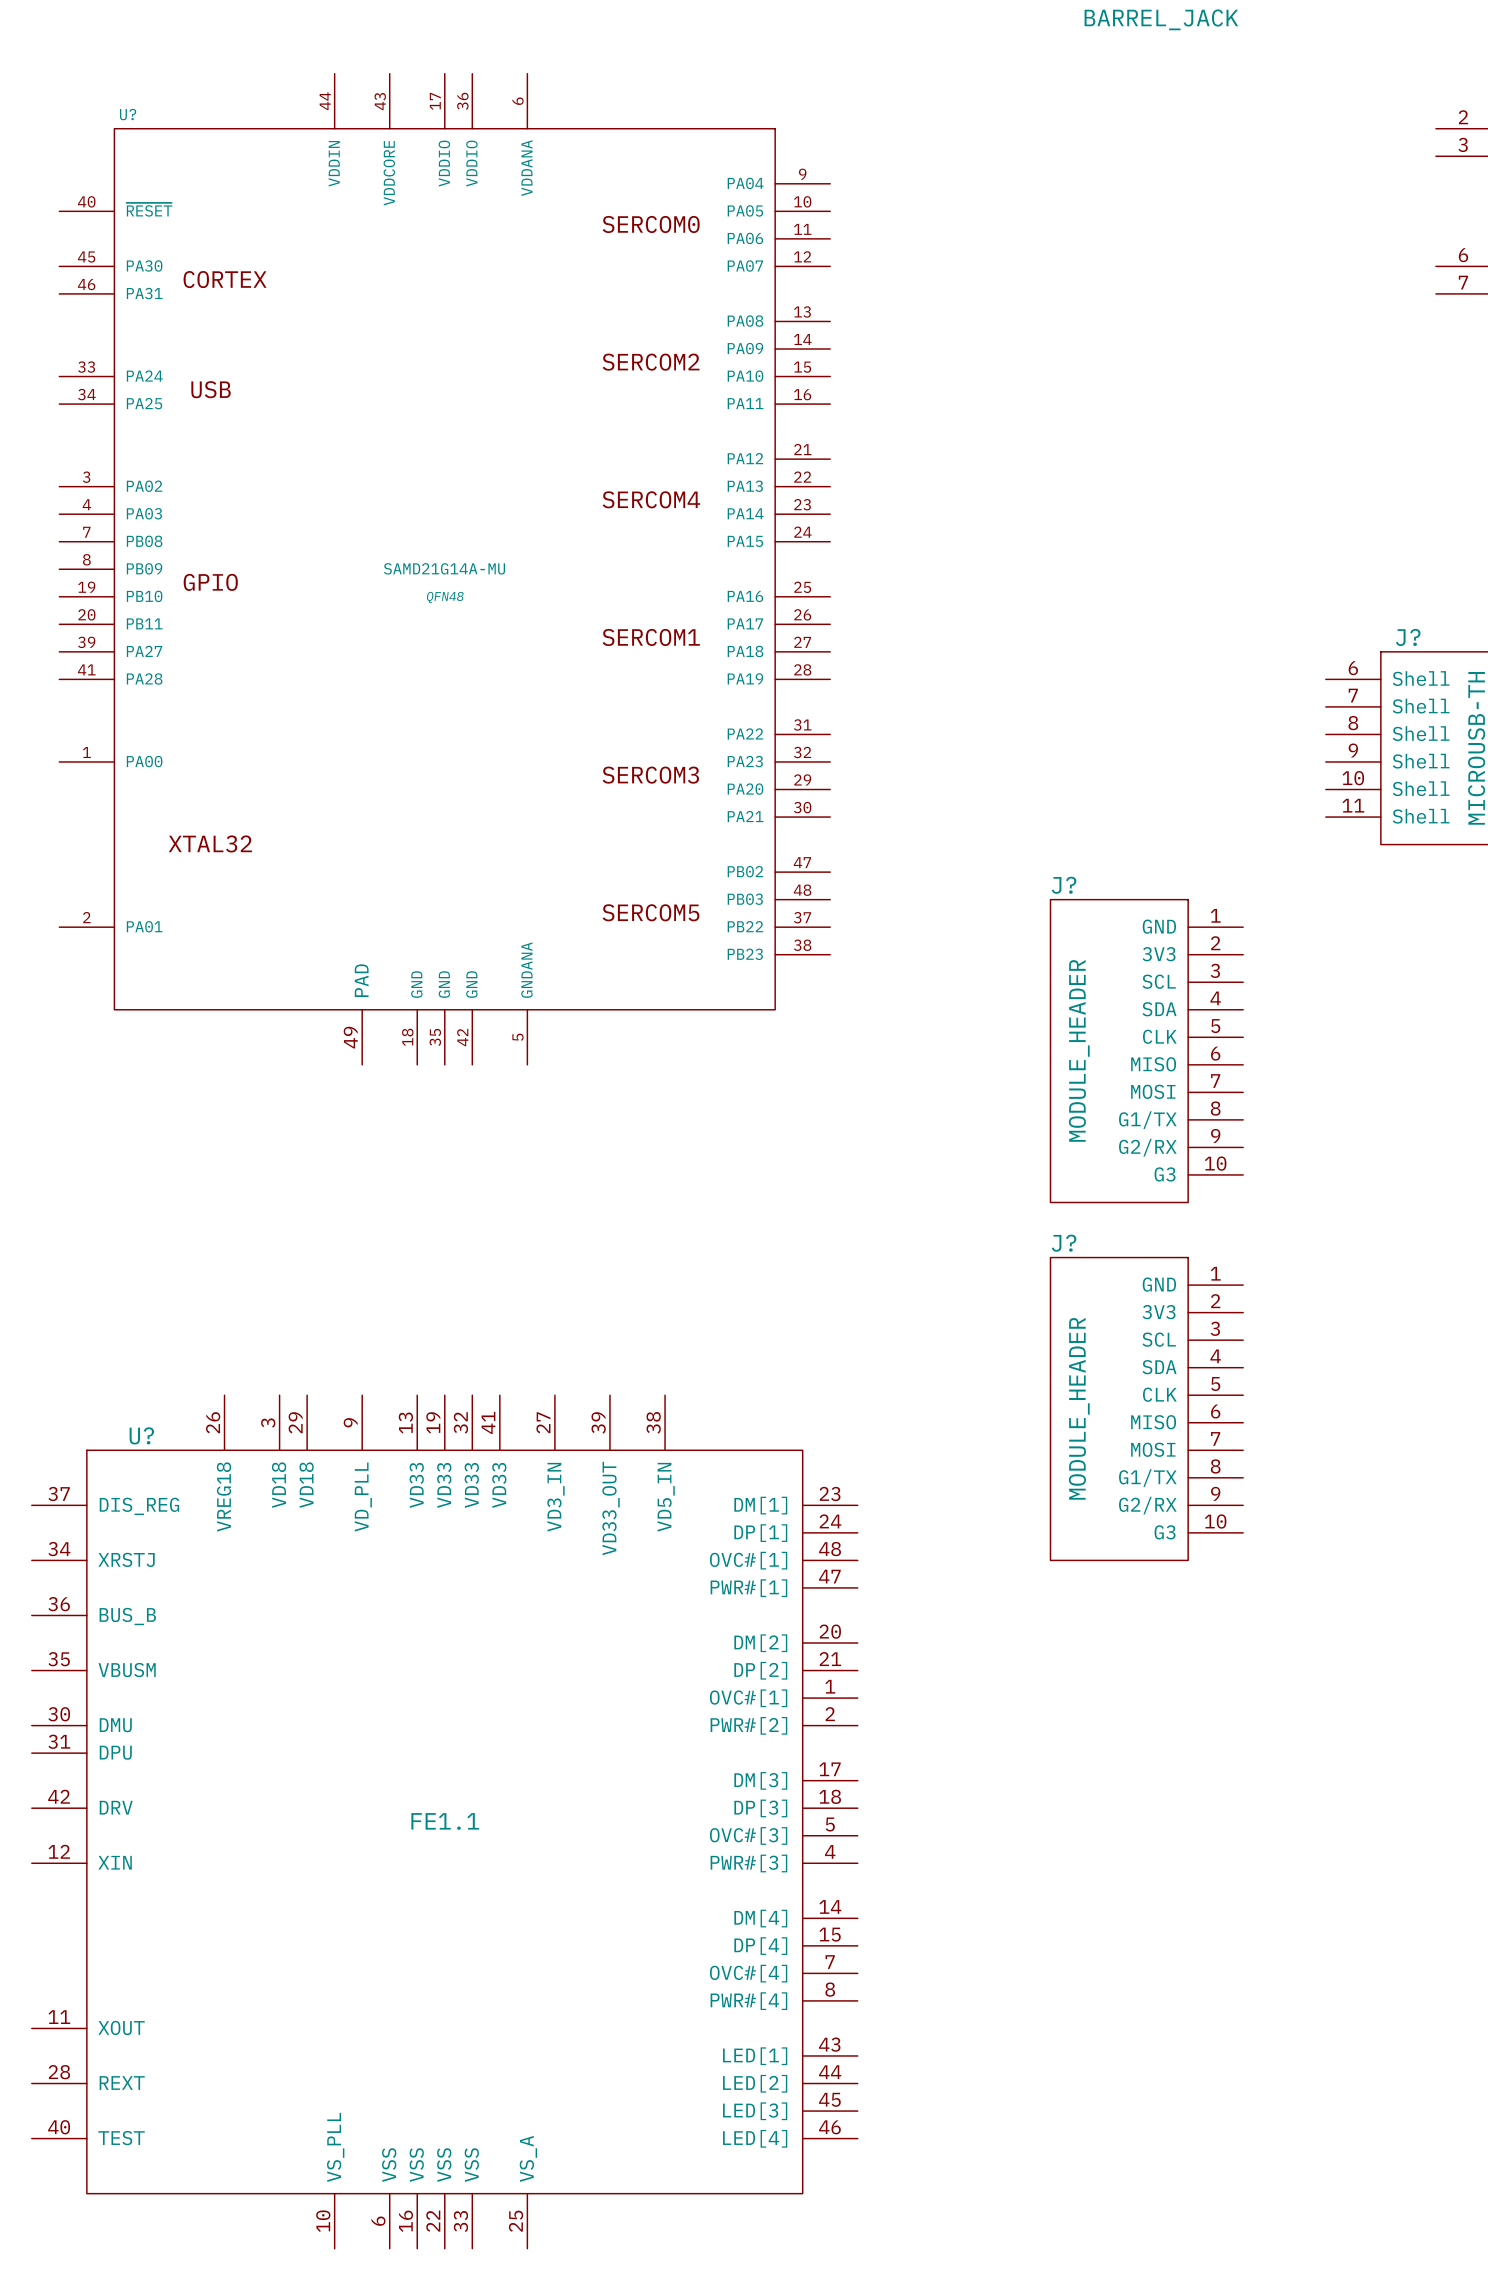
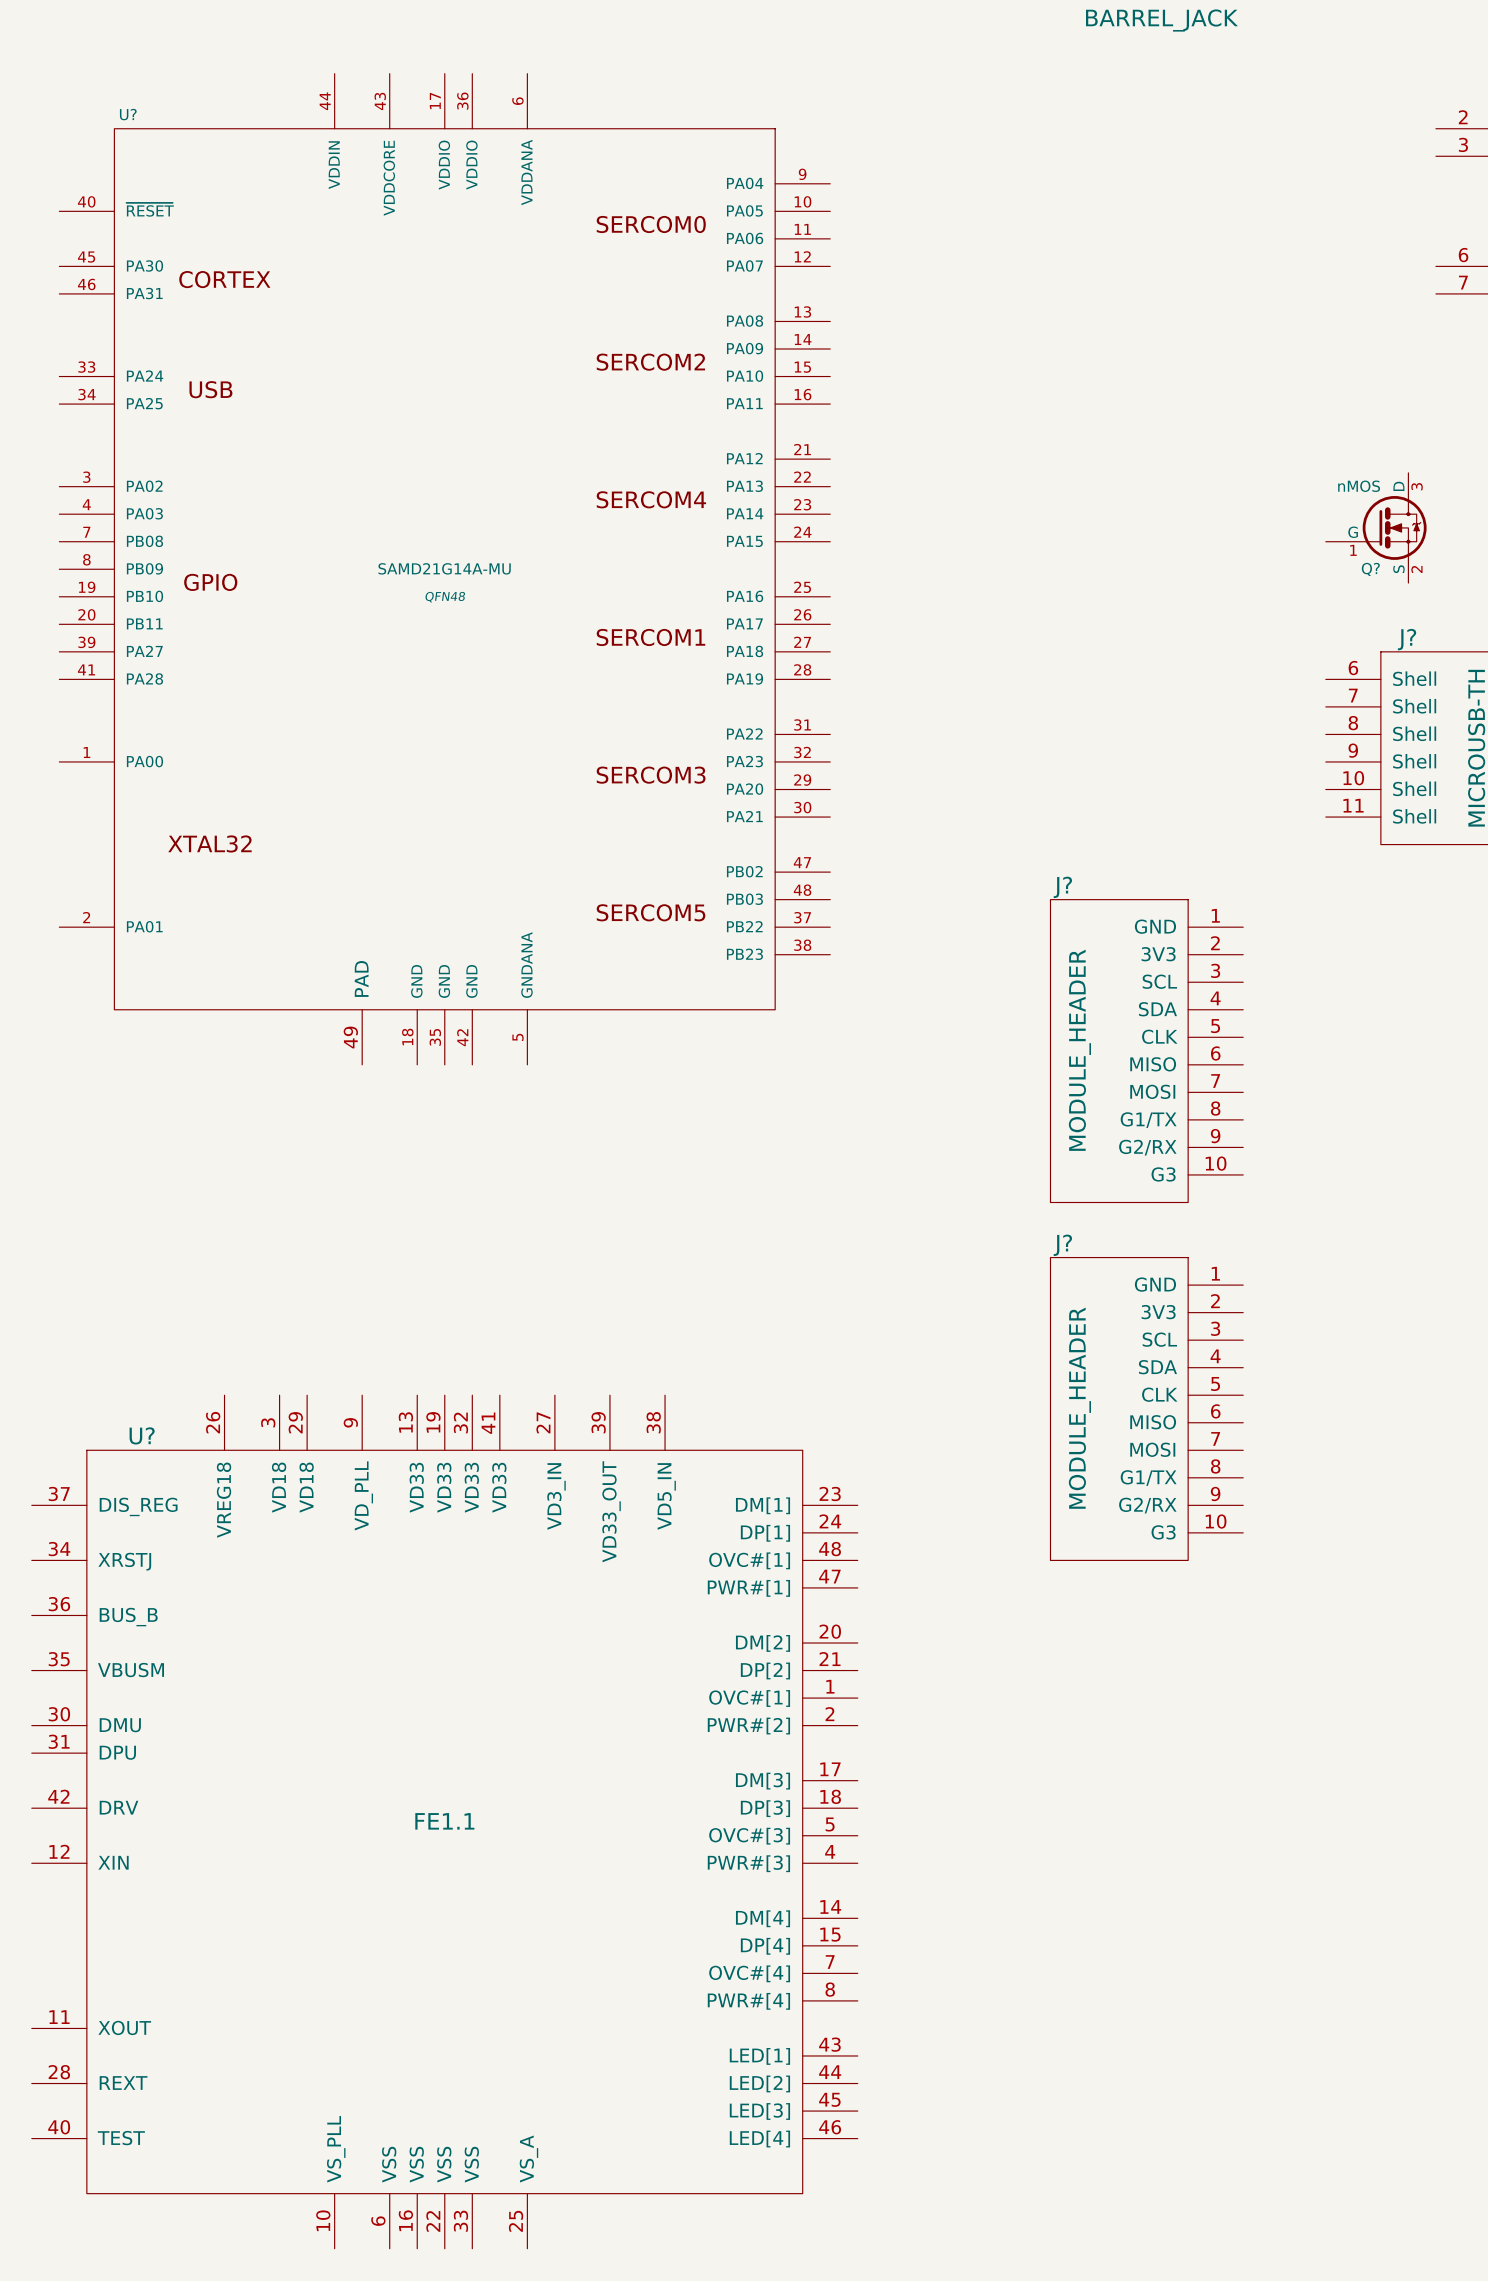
Q?: none -> nMOS (1376, 527)

